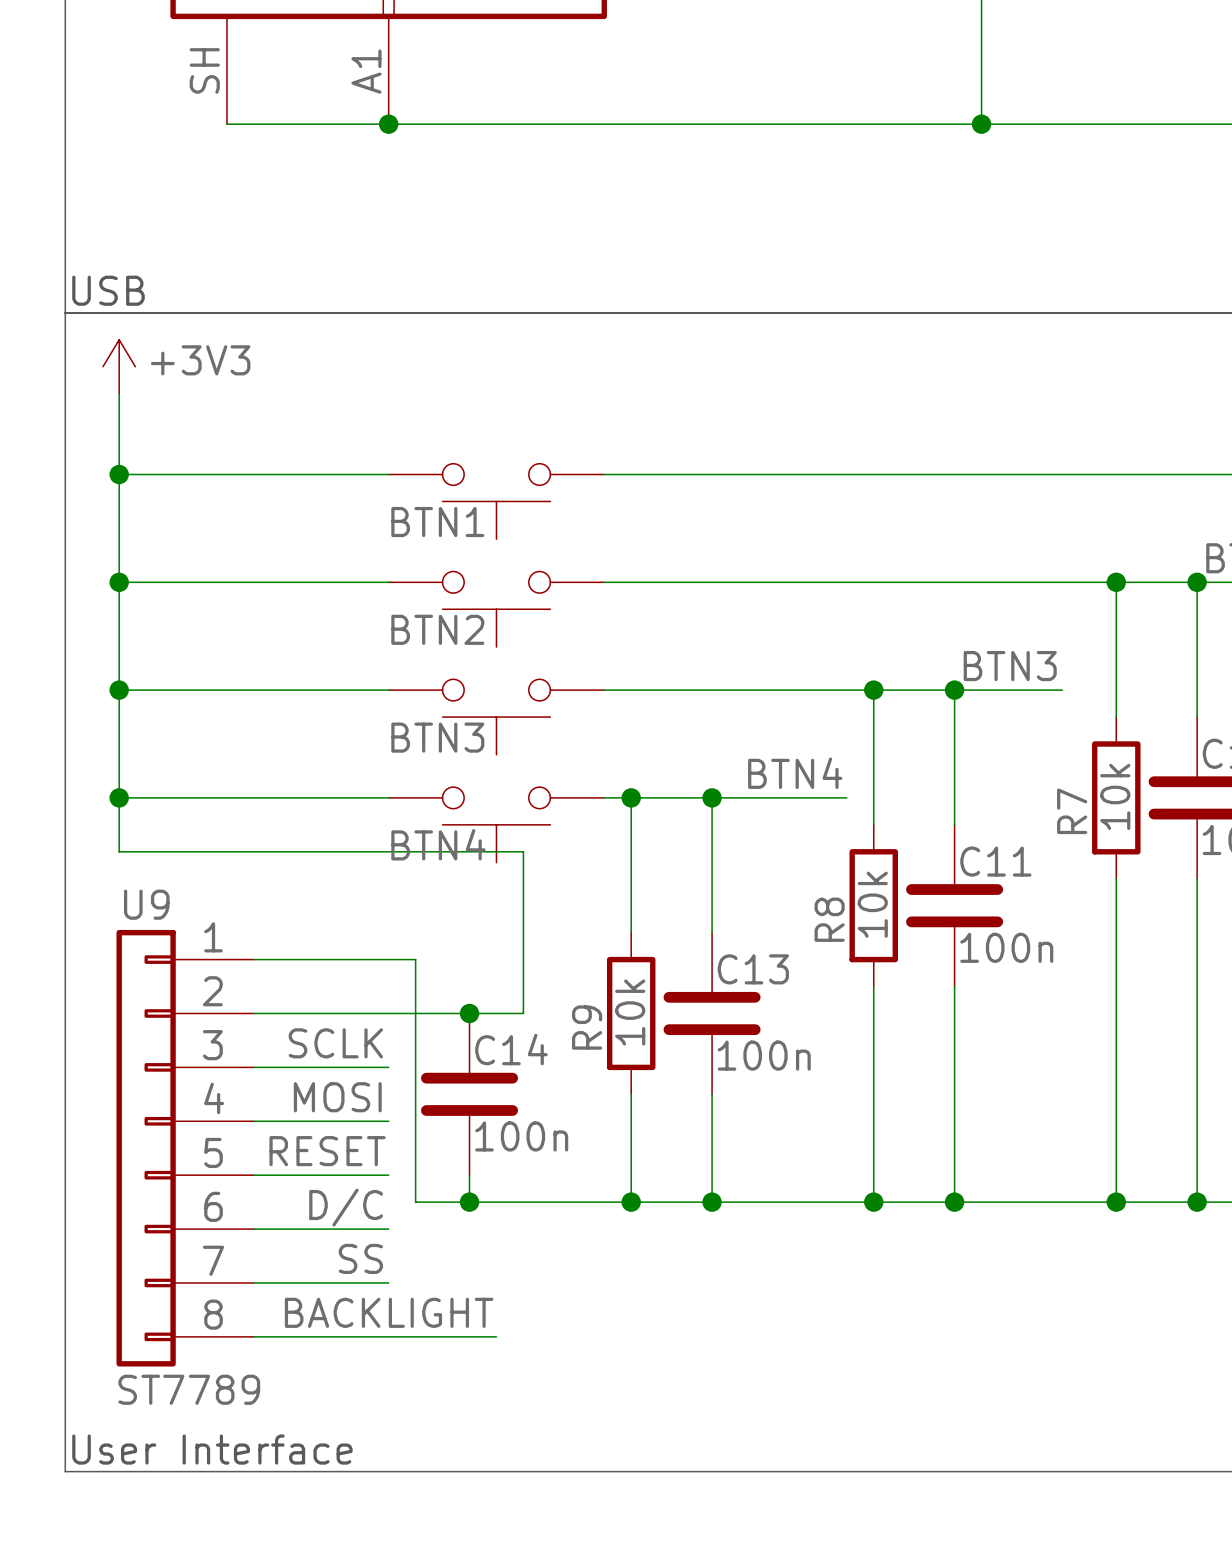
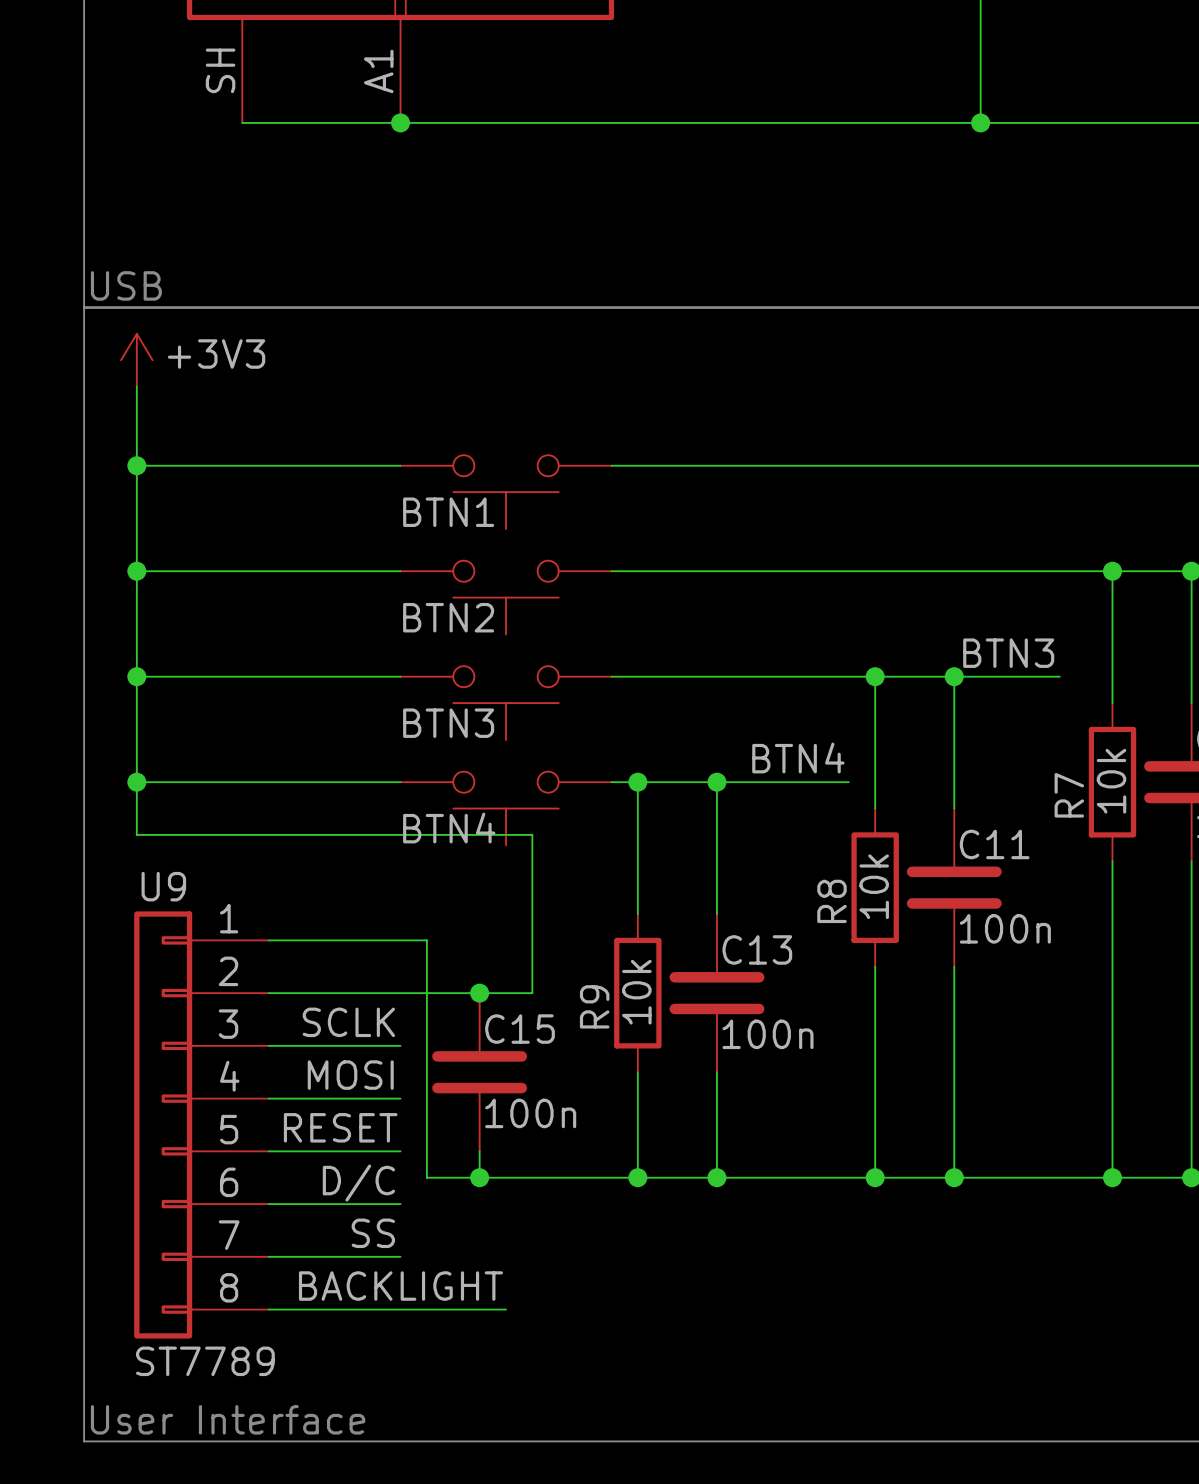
C14 name: C14 (511, 1049) -> C15 (520, 1029)

